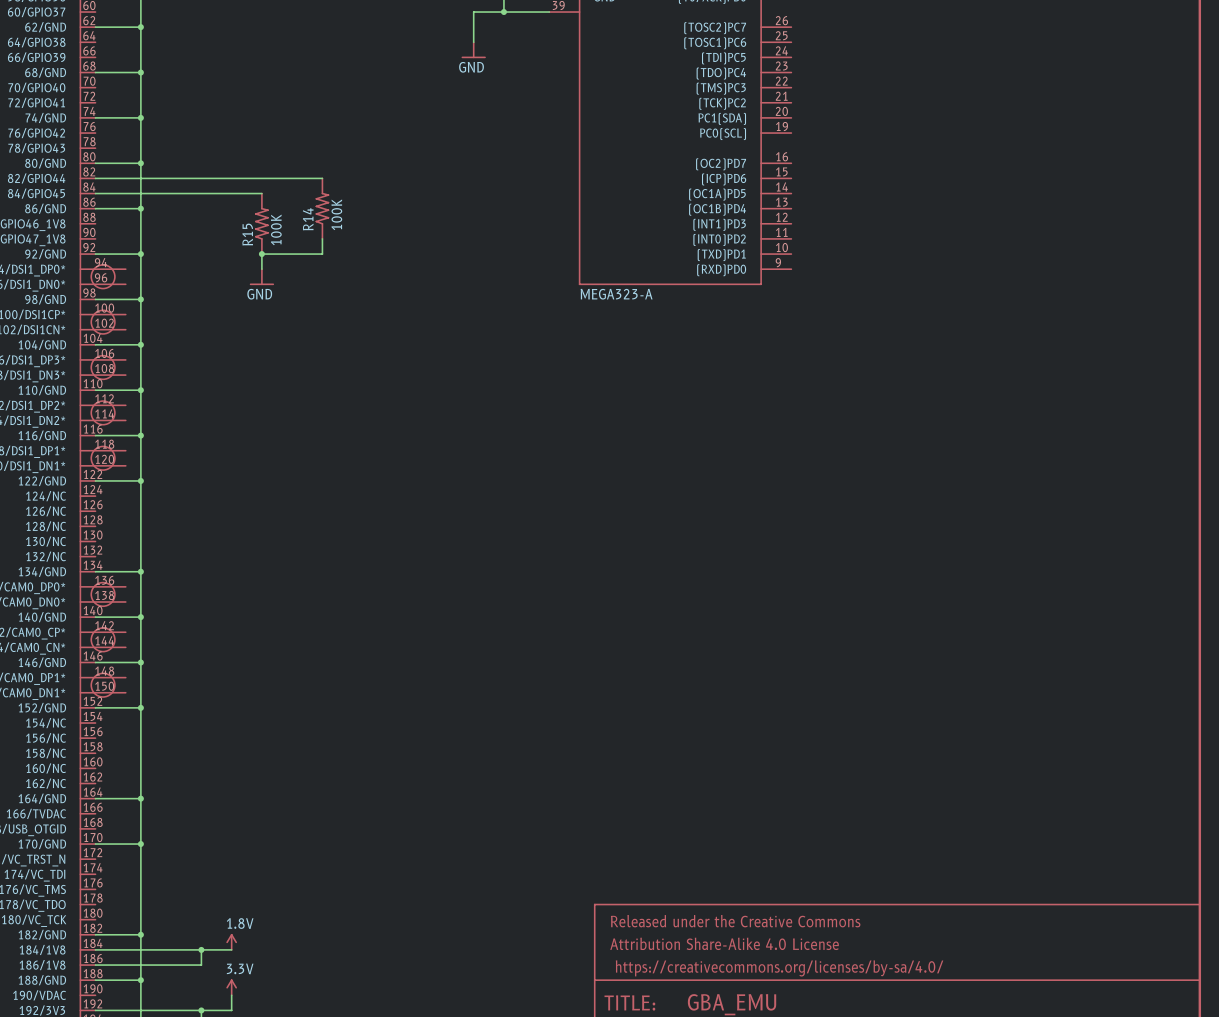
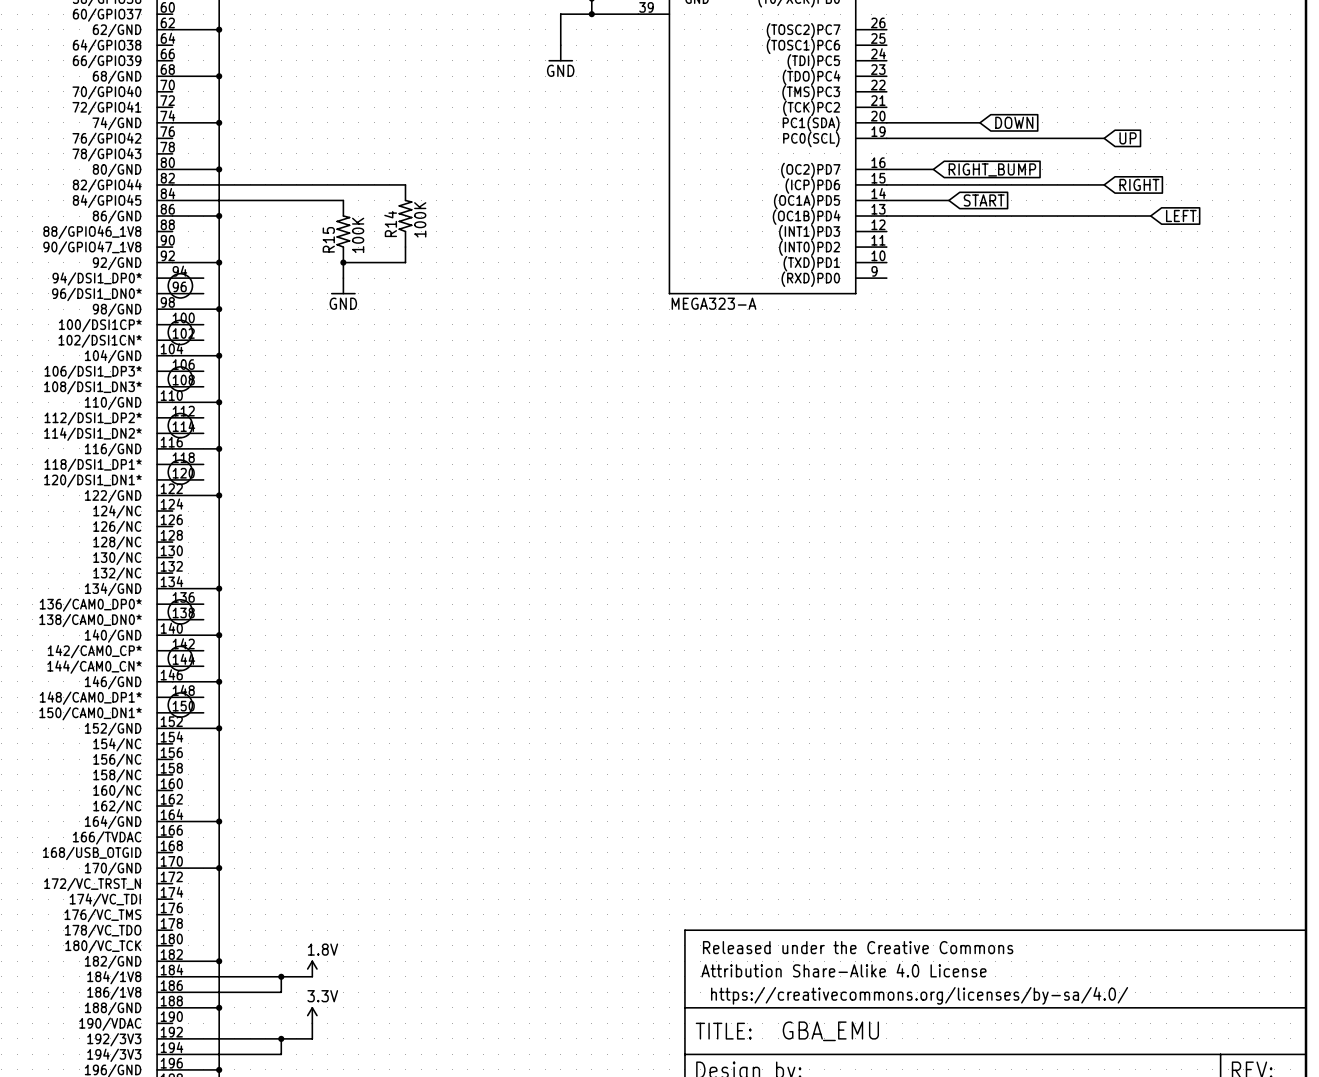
wire: none -> (886, 122) (979, 122)
global label: none -> DOWN (1014, 122)
wire: none -> (886, 138) (1104, 138)
global label: none -> UP (1128, 138)
wire: none -> (886, 169) (933, 169)
global label: none -> RIGHT_BUMP (992, 169)
wire: none -> (886, 184) (1104, 184)
global label: none -> RIGHT (1139, 184)
wire: none -> (886, 200) (948, 200)
global label: none -> START (984, 200)
wire: none -> (886, 216) (1150, 216)
global label: none -> LEFT (1181, 216)

